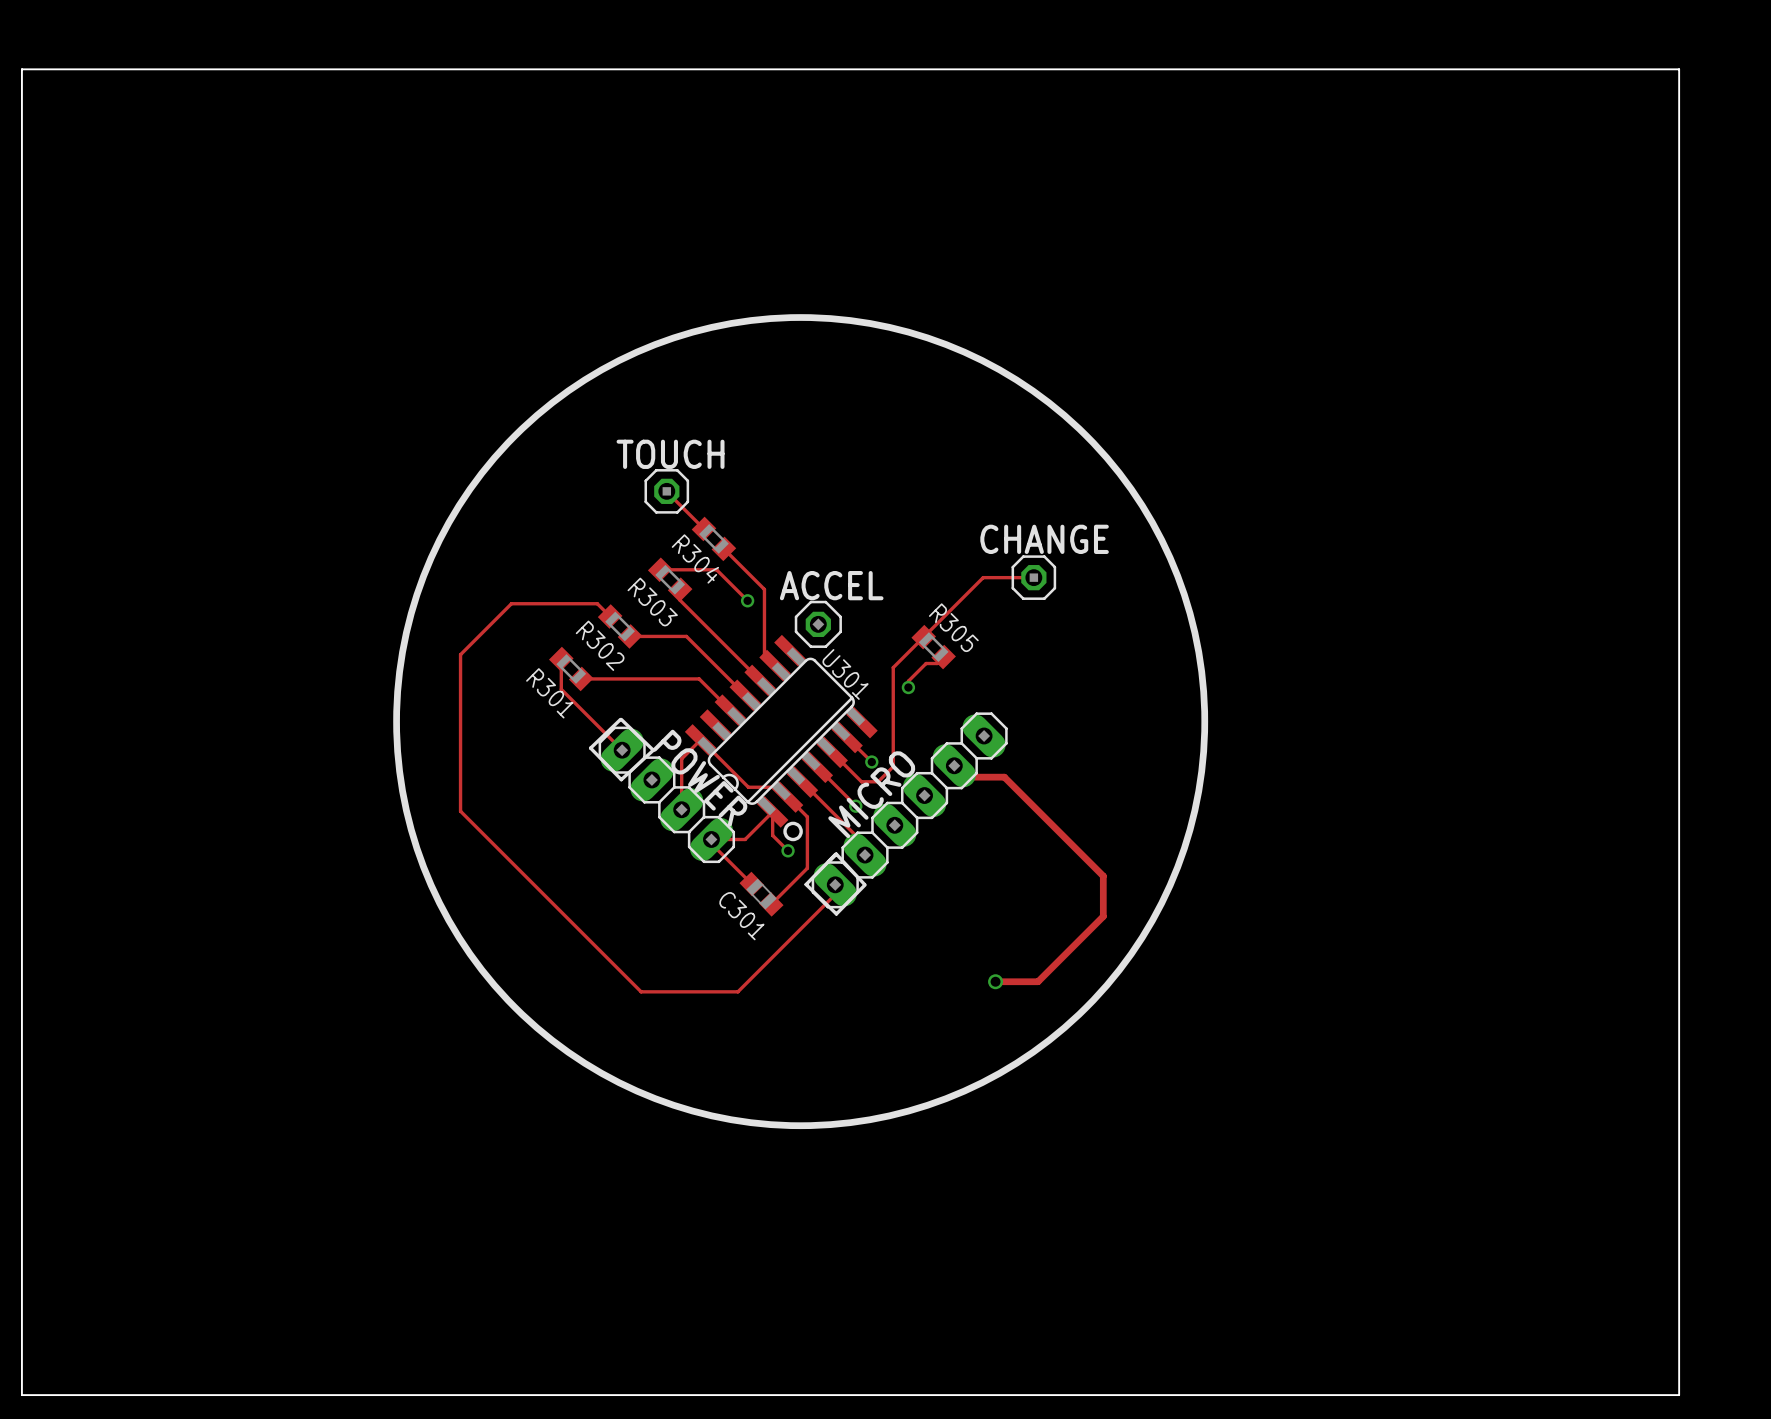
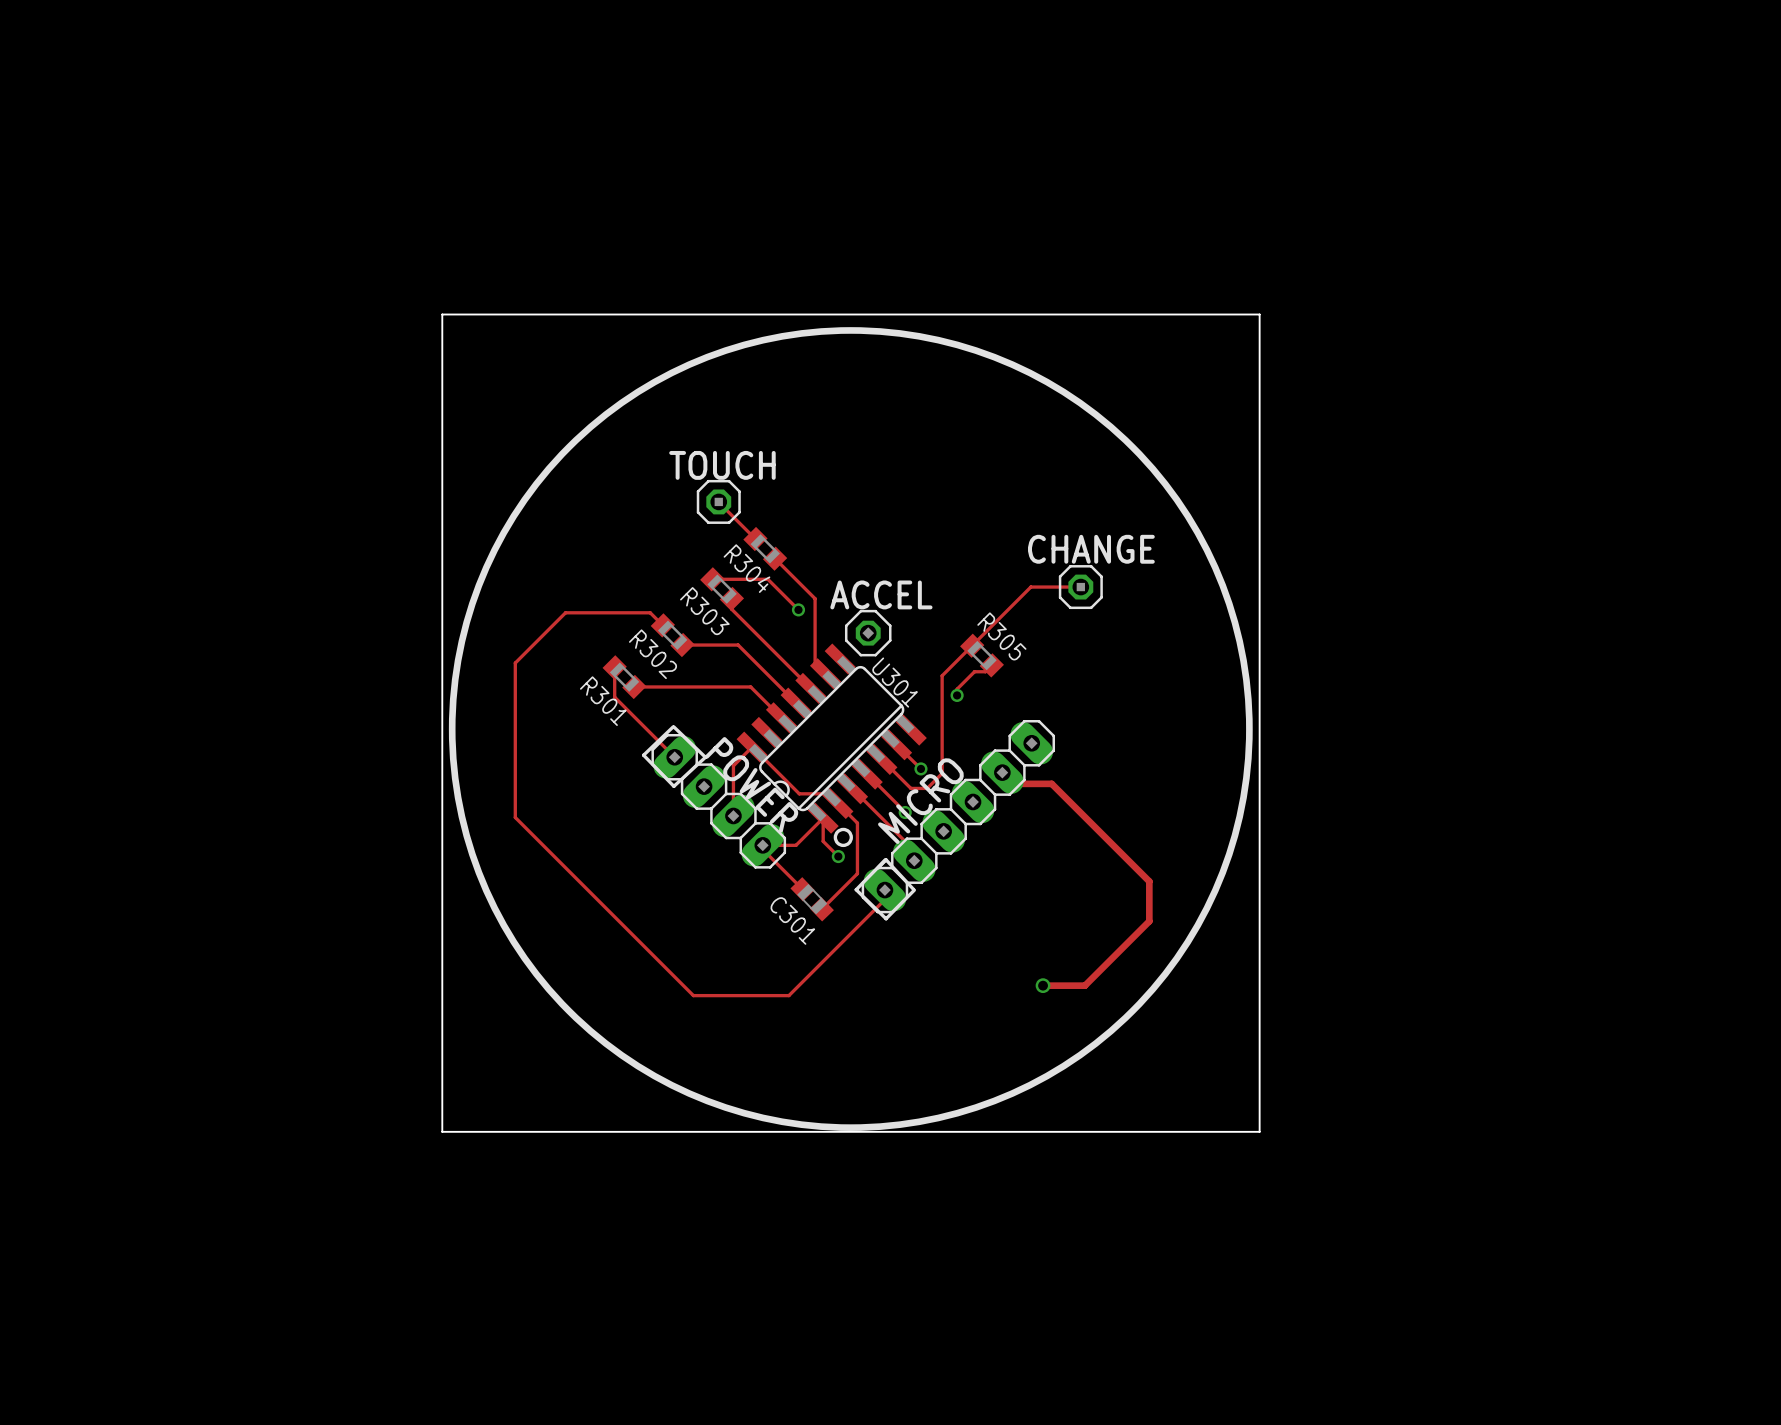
board edge: (21, 69) (1679, 69) (1679, 1395) (21, 1395) (21, 69) -> none
board edge: none -> (442, 314) (1259, 314) (1259, 1131) (442, 1131) (442, 314)

